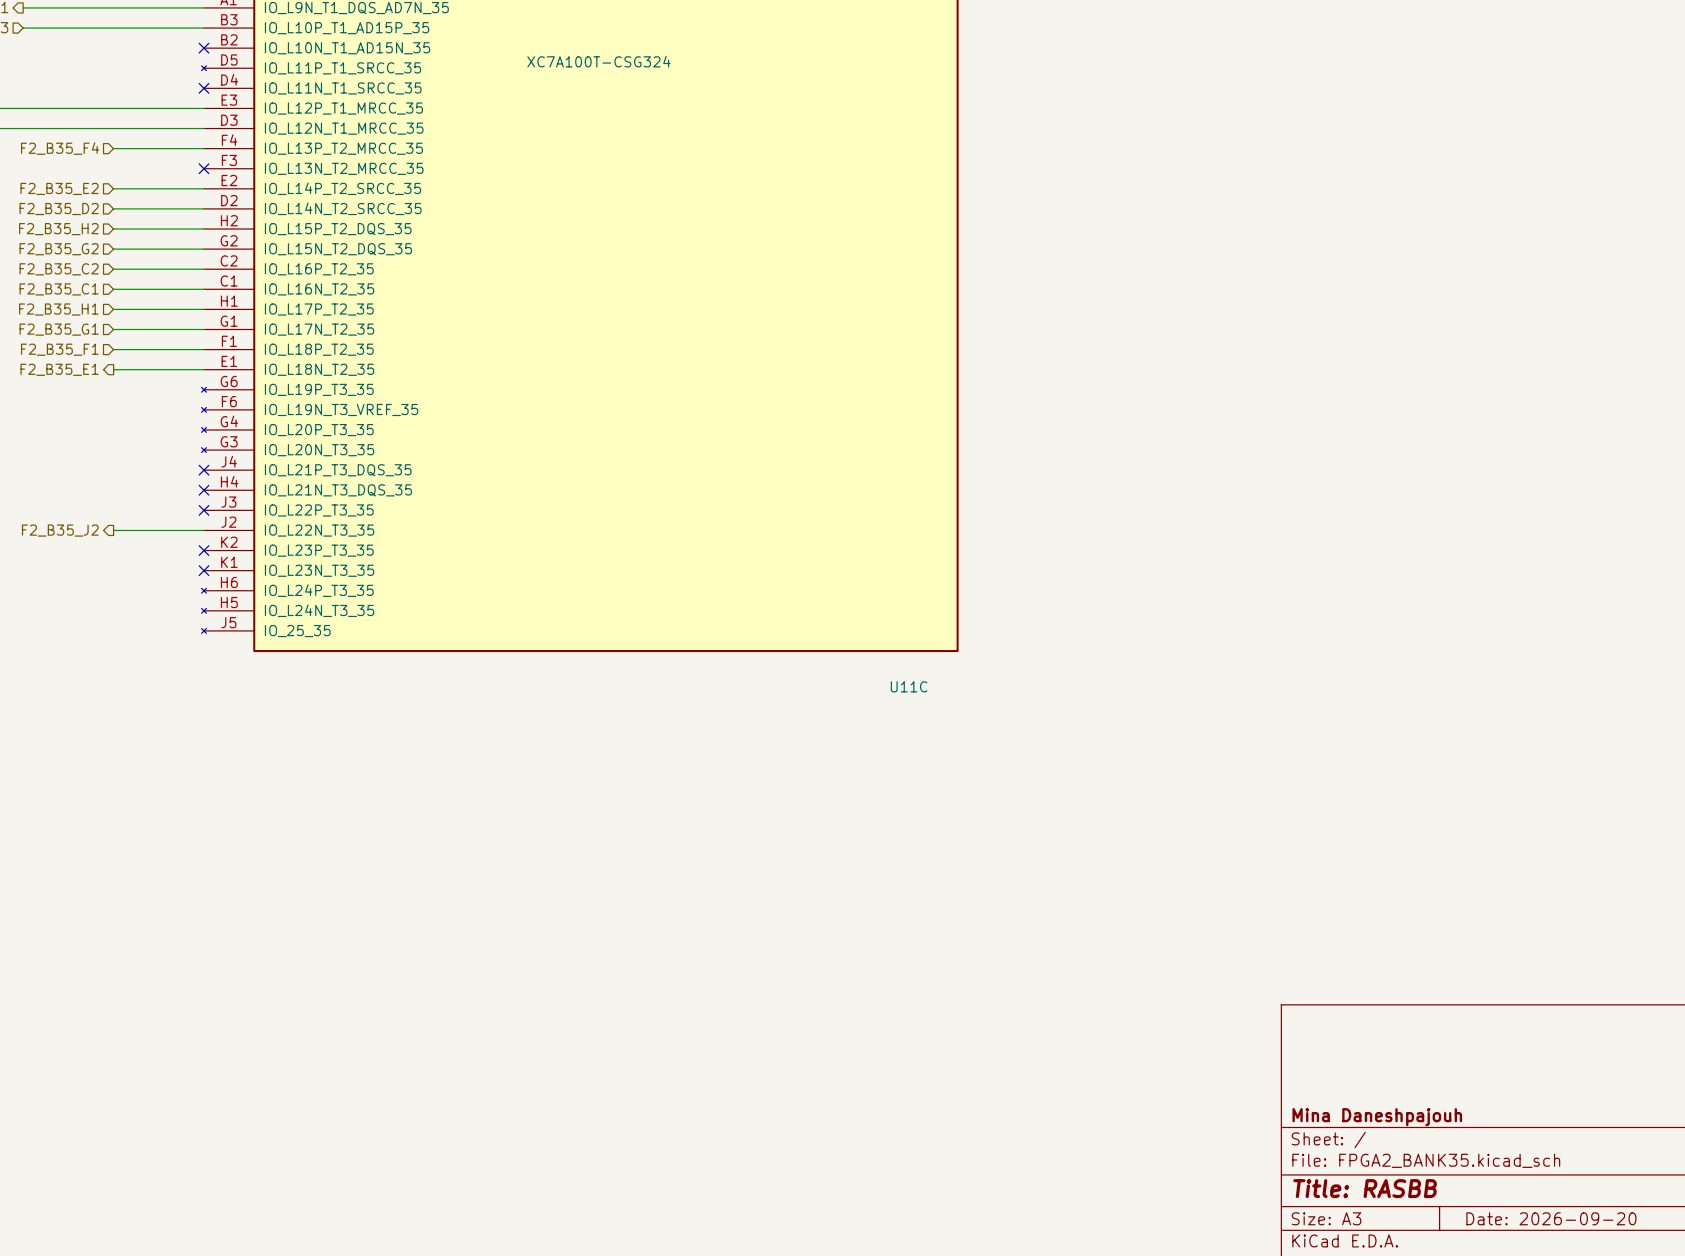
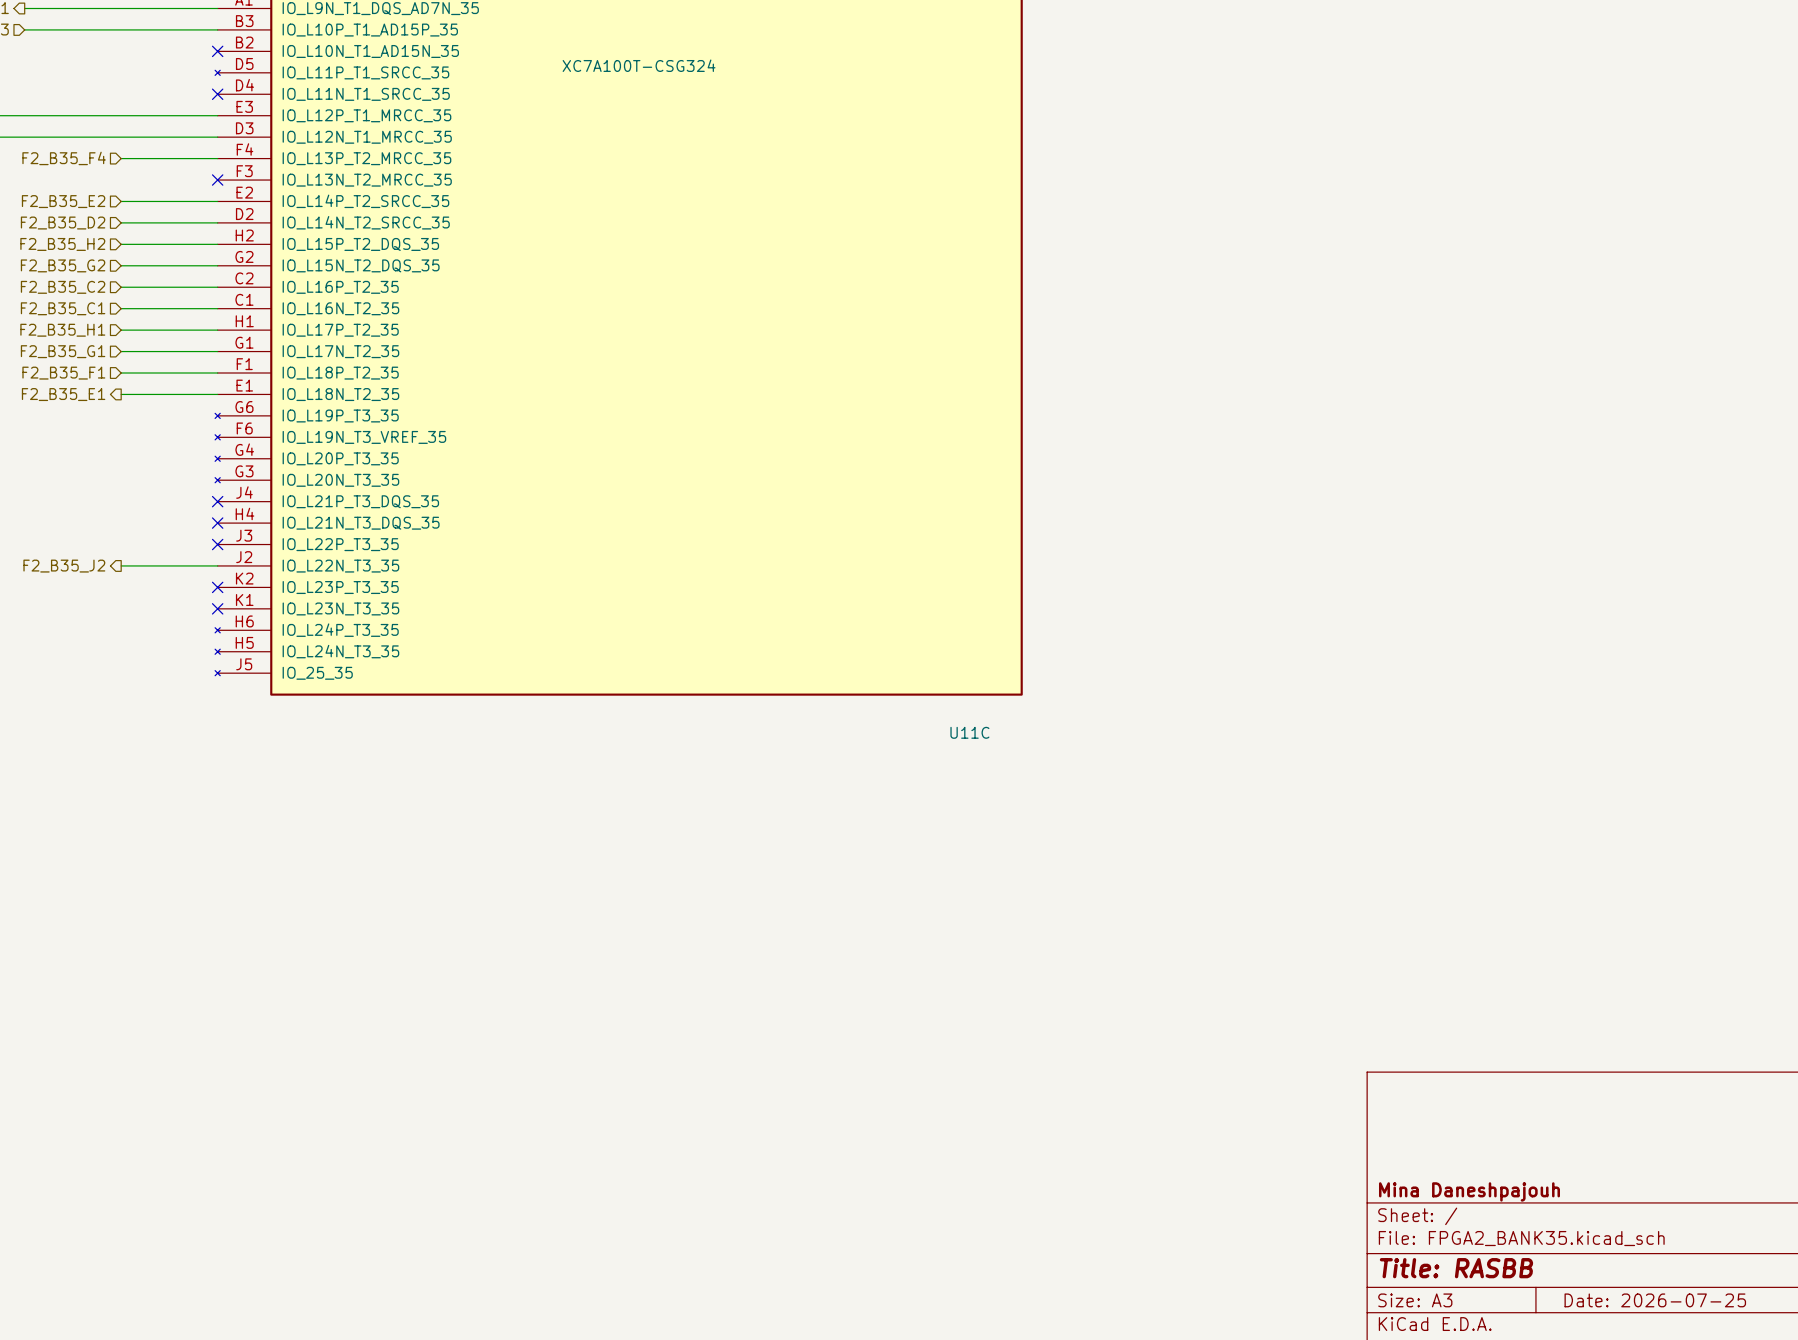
title block: Date: 2026-09-20 (1551, 1218) -> Date: 2026-07-25 (1655, 1300)

